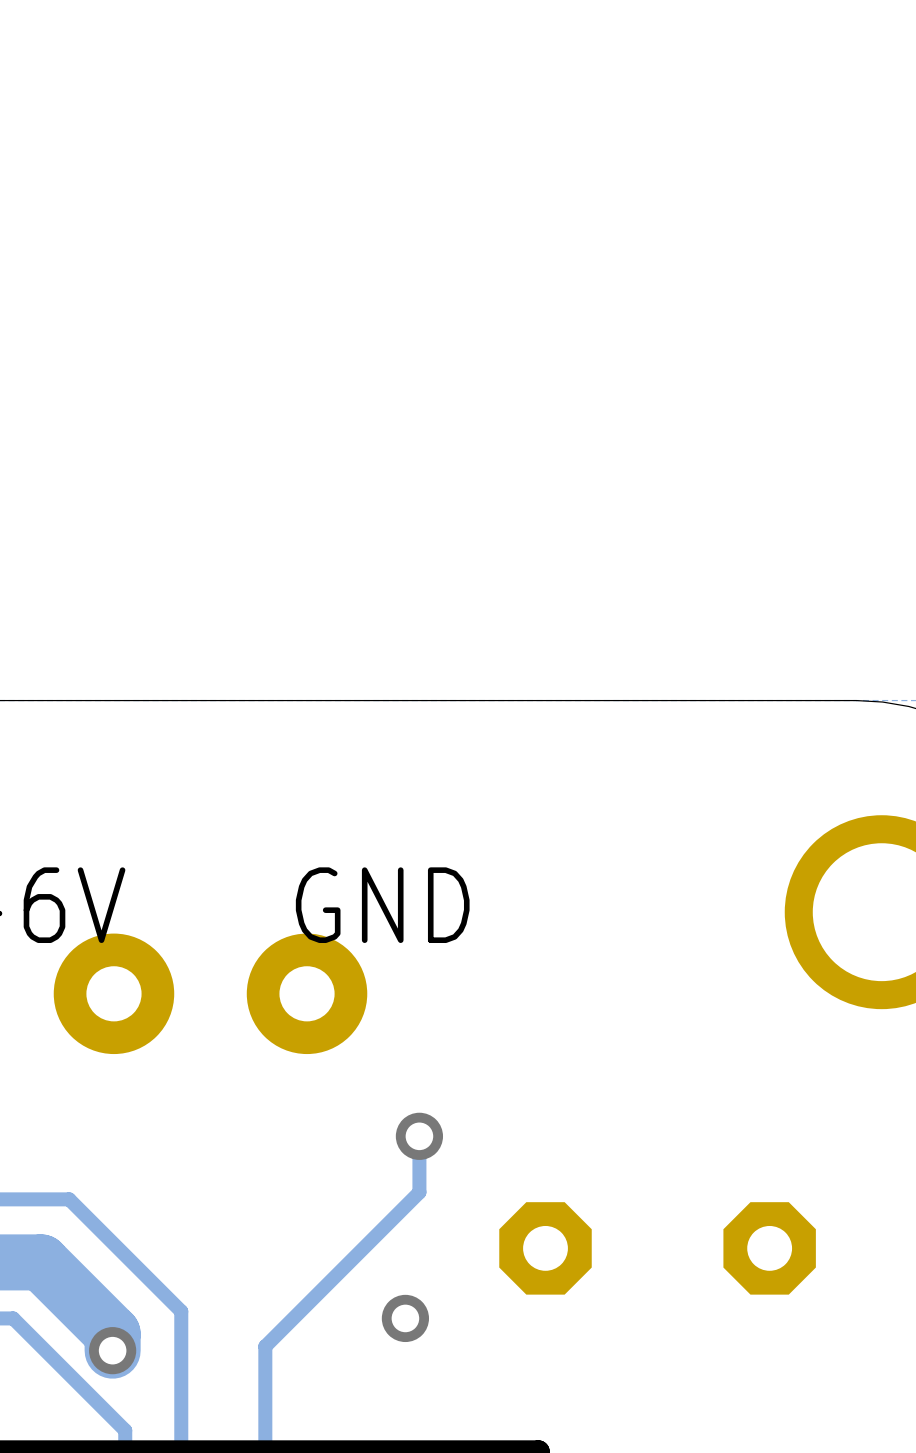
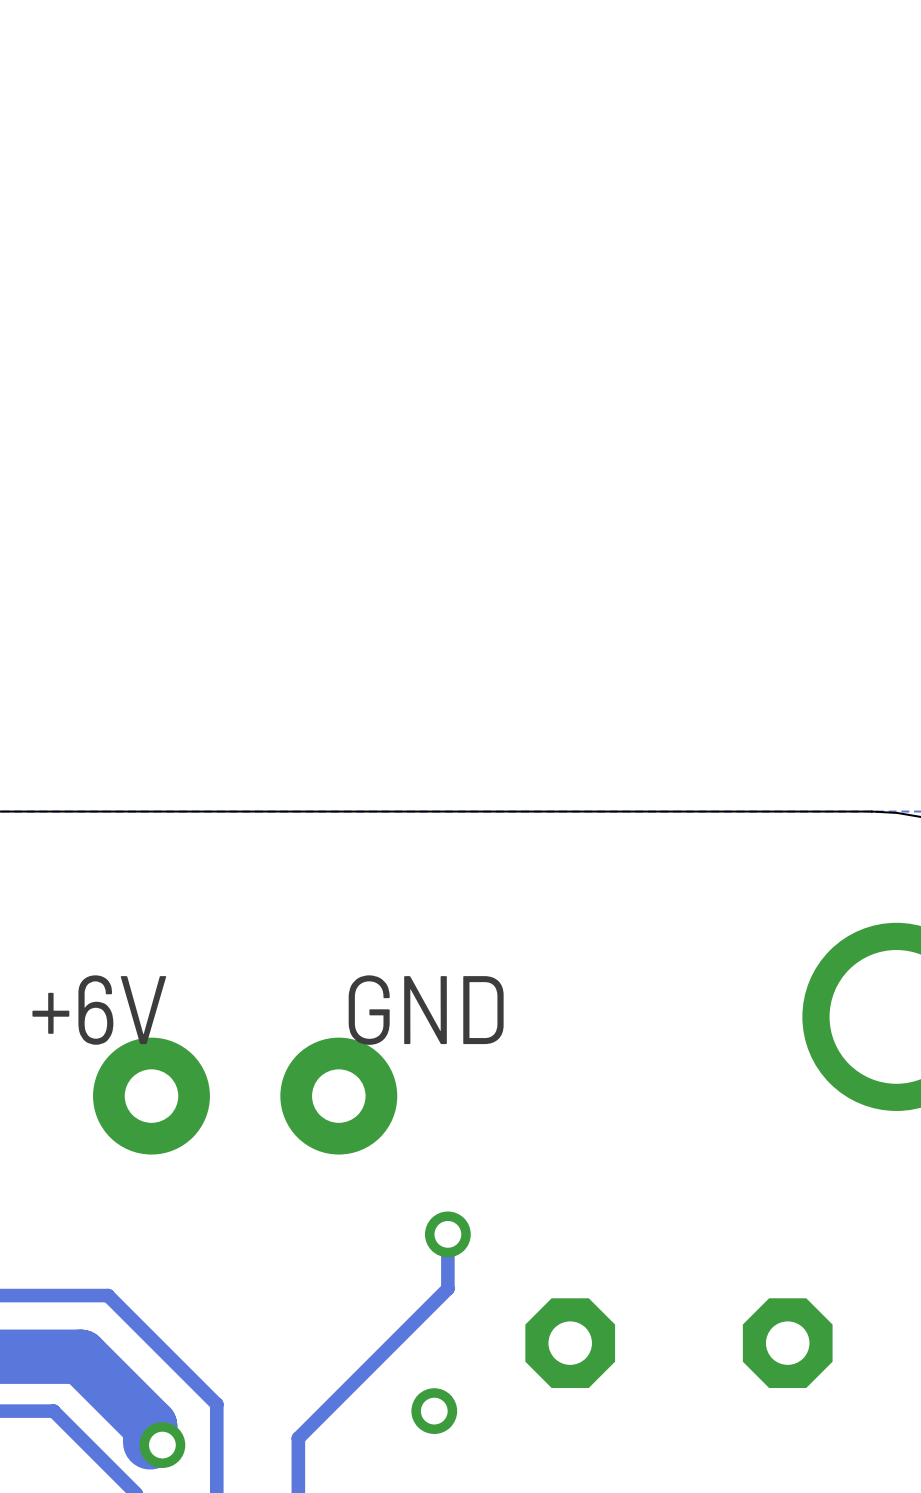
via position: (112, 1350) -> (162, 1445)

